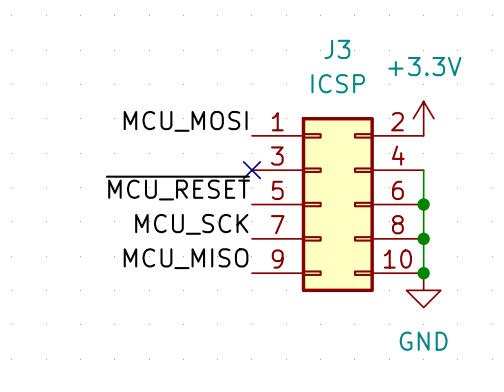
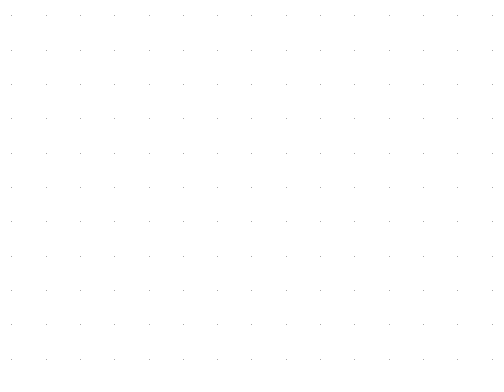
power symbol: +3.3V (423, 118) -> none
label: MCU_MOSI (185, 121) -> none
no-connect mark: (251, 170) -> none
wire: (423, 170) (423, 273) -> none
label: ~{MCU_RESET} (177, 188) -> none
J3: ICSP (337, 204) -> none
junction: (423, 204) -> none
label: MCU_SCK (191, 224) -> none
junction: (423, 238) -> none
label: MCU_MISO (186, 258) -> none
junction: (423, 273) -> none
power symbol: GND (423, 290) -> none

